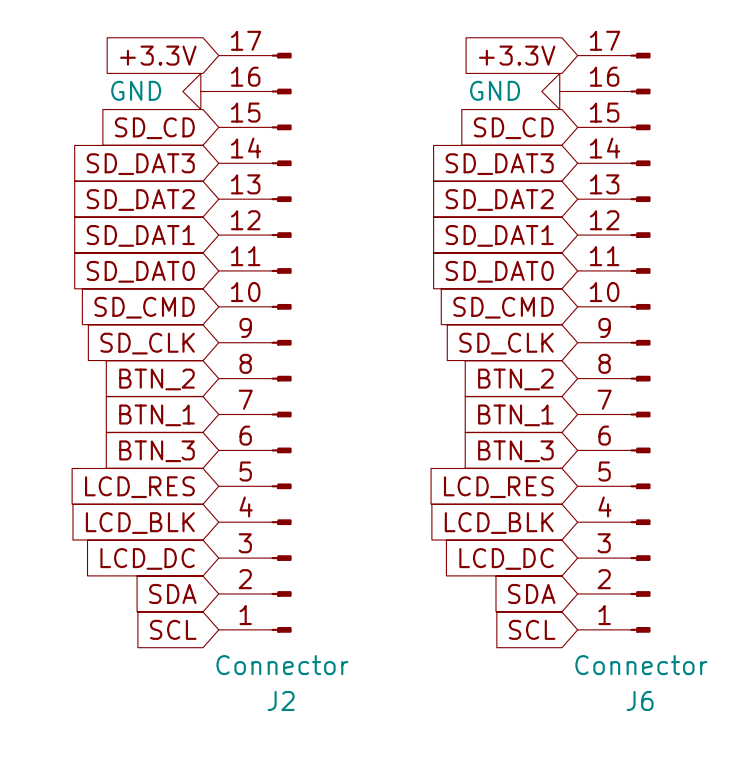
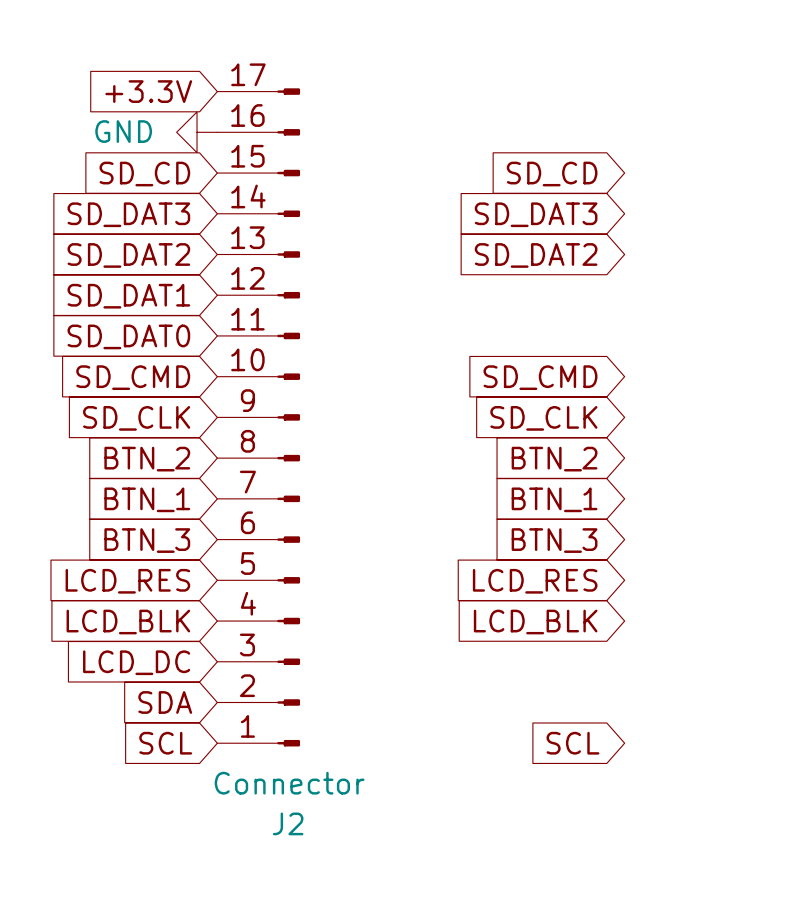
global label: +3.3V (517, 55) -> none
power symbol: GND (559, 91) -> none
global label: SD_DAT1 (499, 235) -> none
global label: SD_DAT0 (499, 271) -> none
J6: Connector (614, 342) -> none
global label: LCD_DC (506, 558) -> none
global label: SDA (531, 593) -> none

